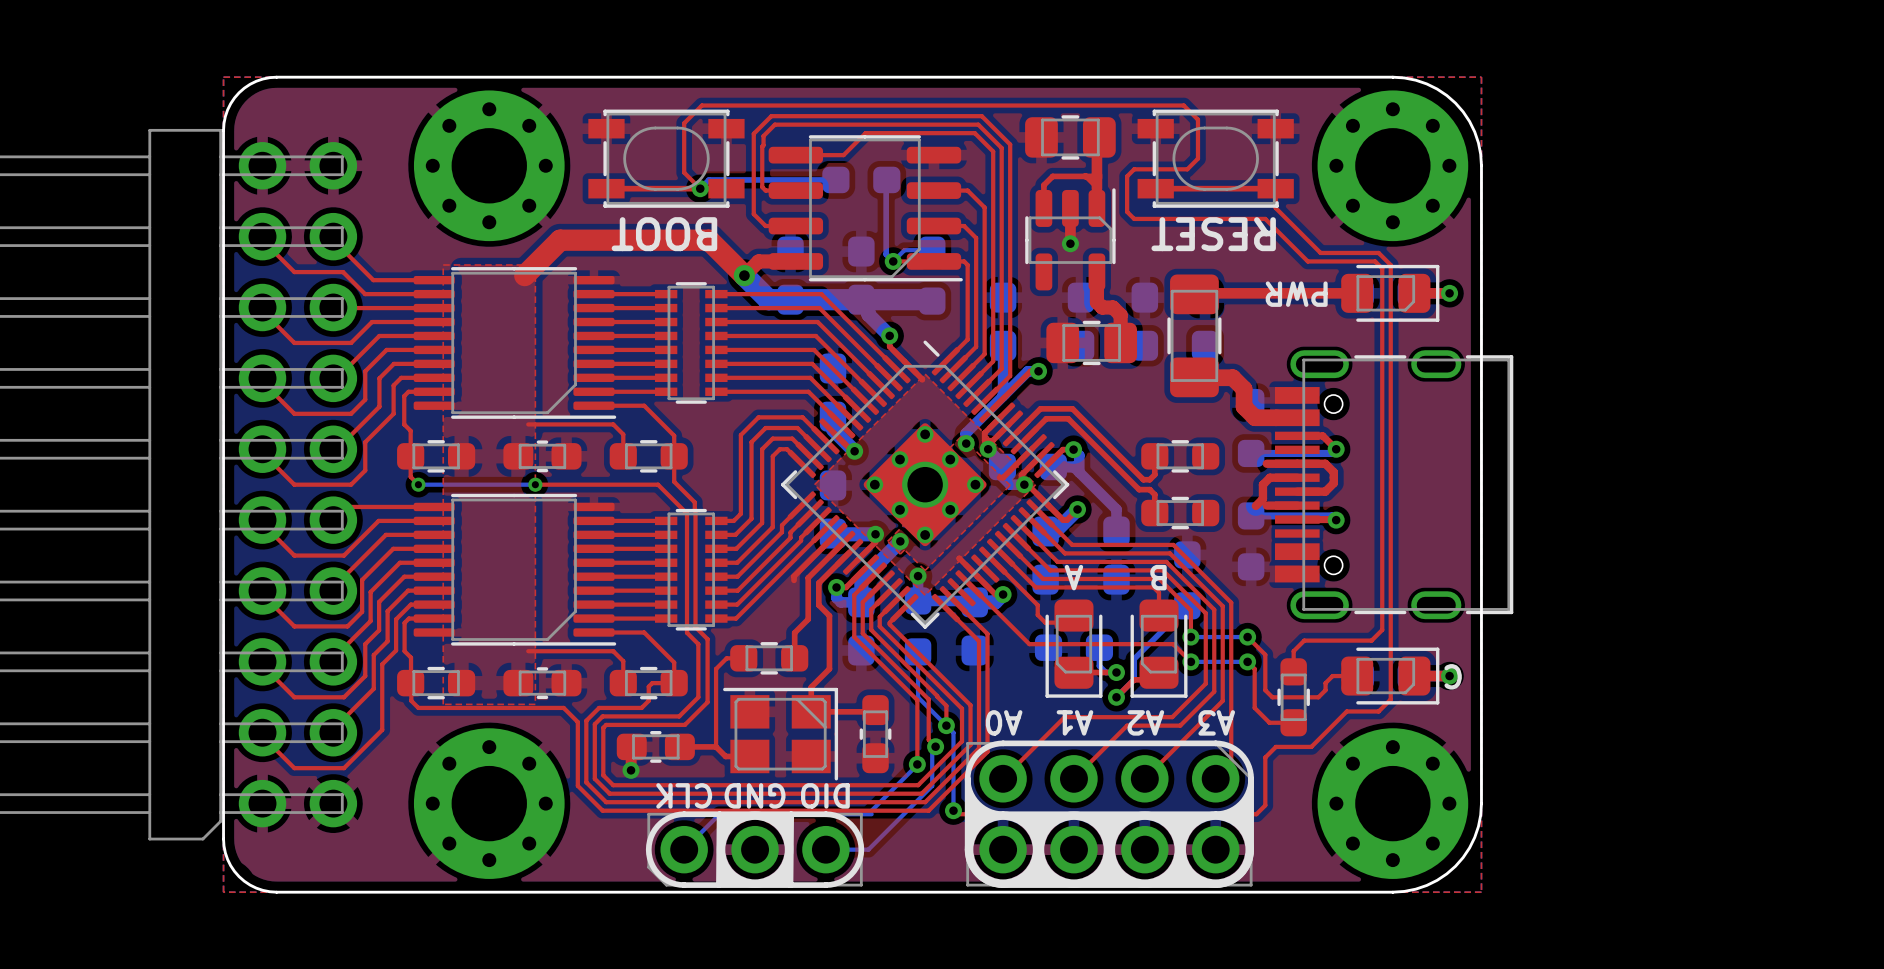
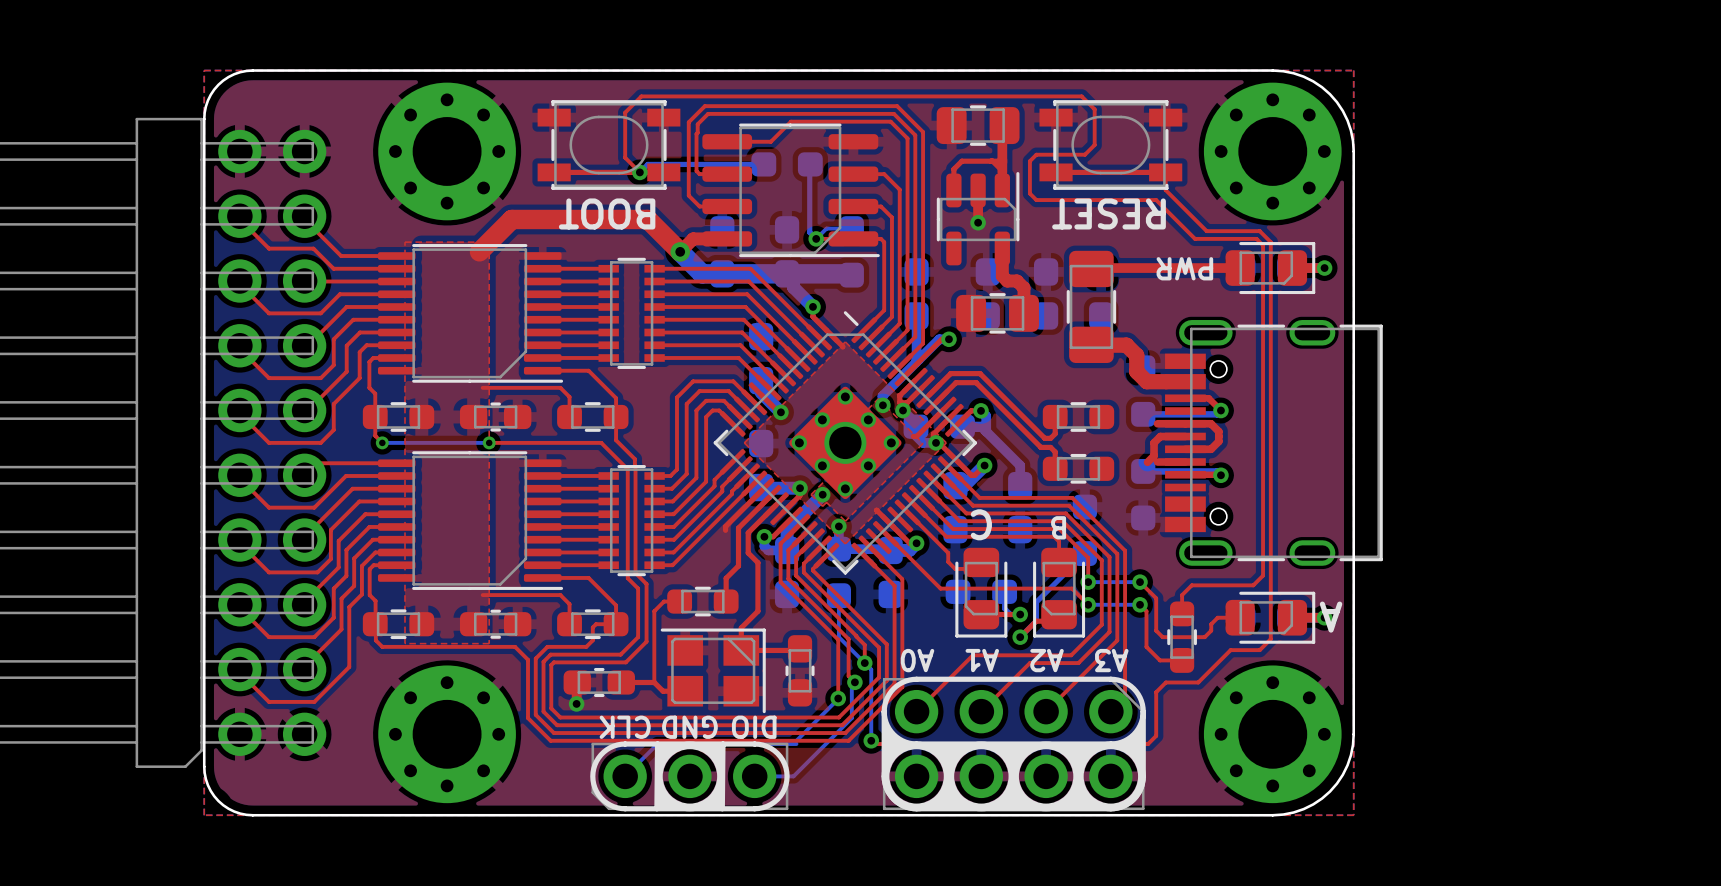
text: A (1073, 577) -> C (981, 524)
text: C (1453, 676) -> A (1331, 617)

